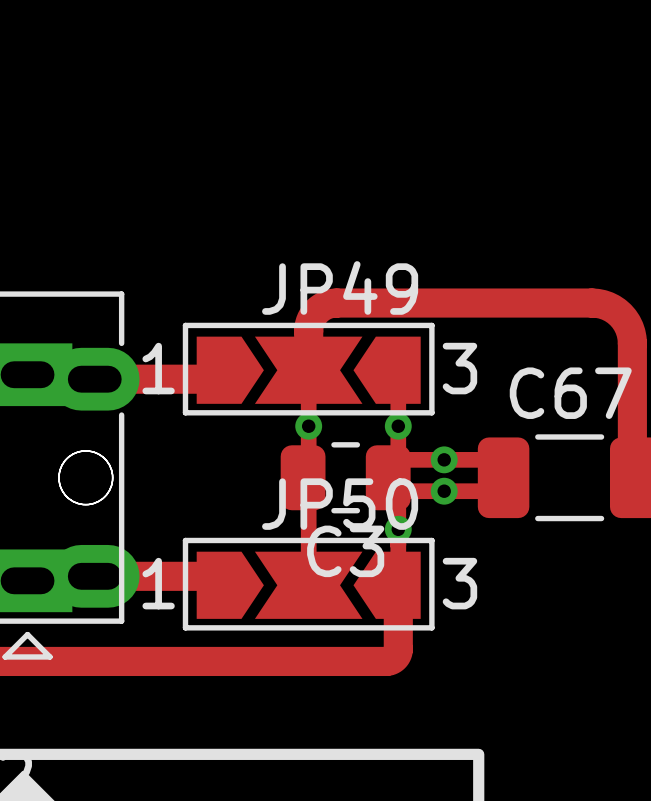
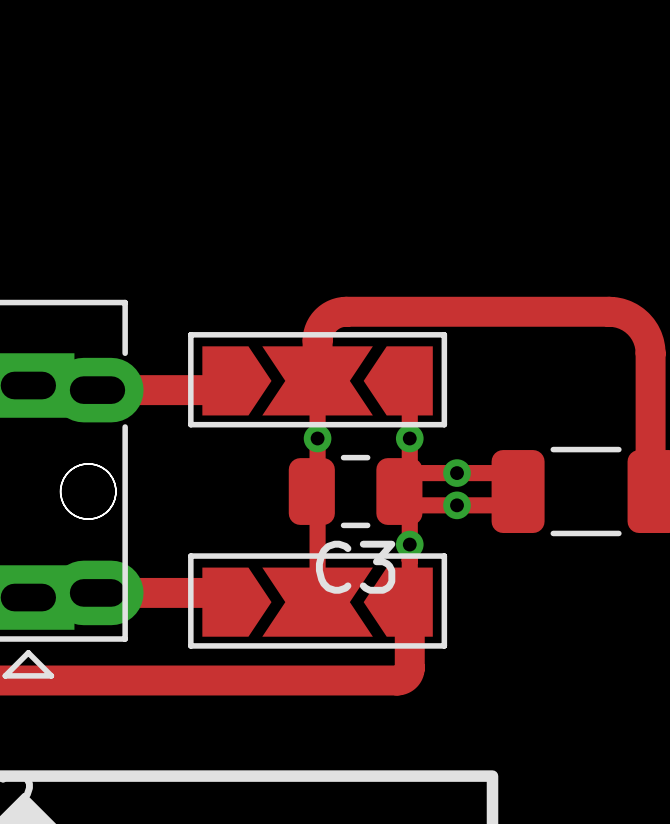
JP49 name: JP49 (340, 287) -> none
JP49 text: 1 (158, 368) -> none
JP49 text: 3 (459, 368) -> none
C67 name: C67 (570, 393) -> none
JP50 name: JP50 (340, 504) -> none
JP50 text: 1 (158, 583) -> none
JP50 text: 3 (459, 583) -> none

